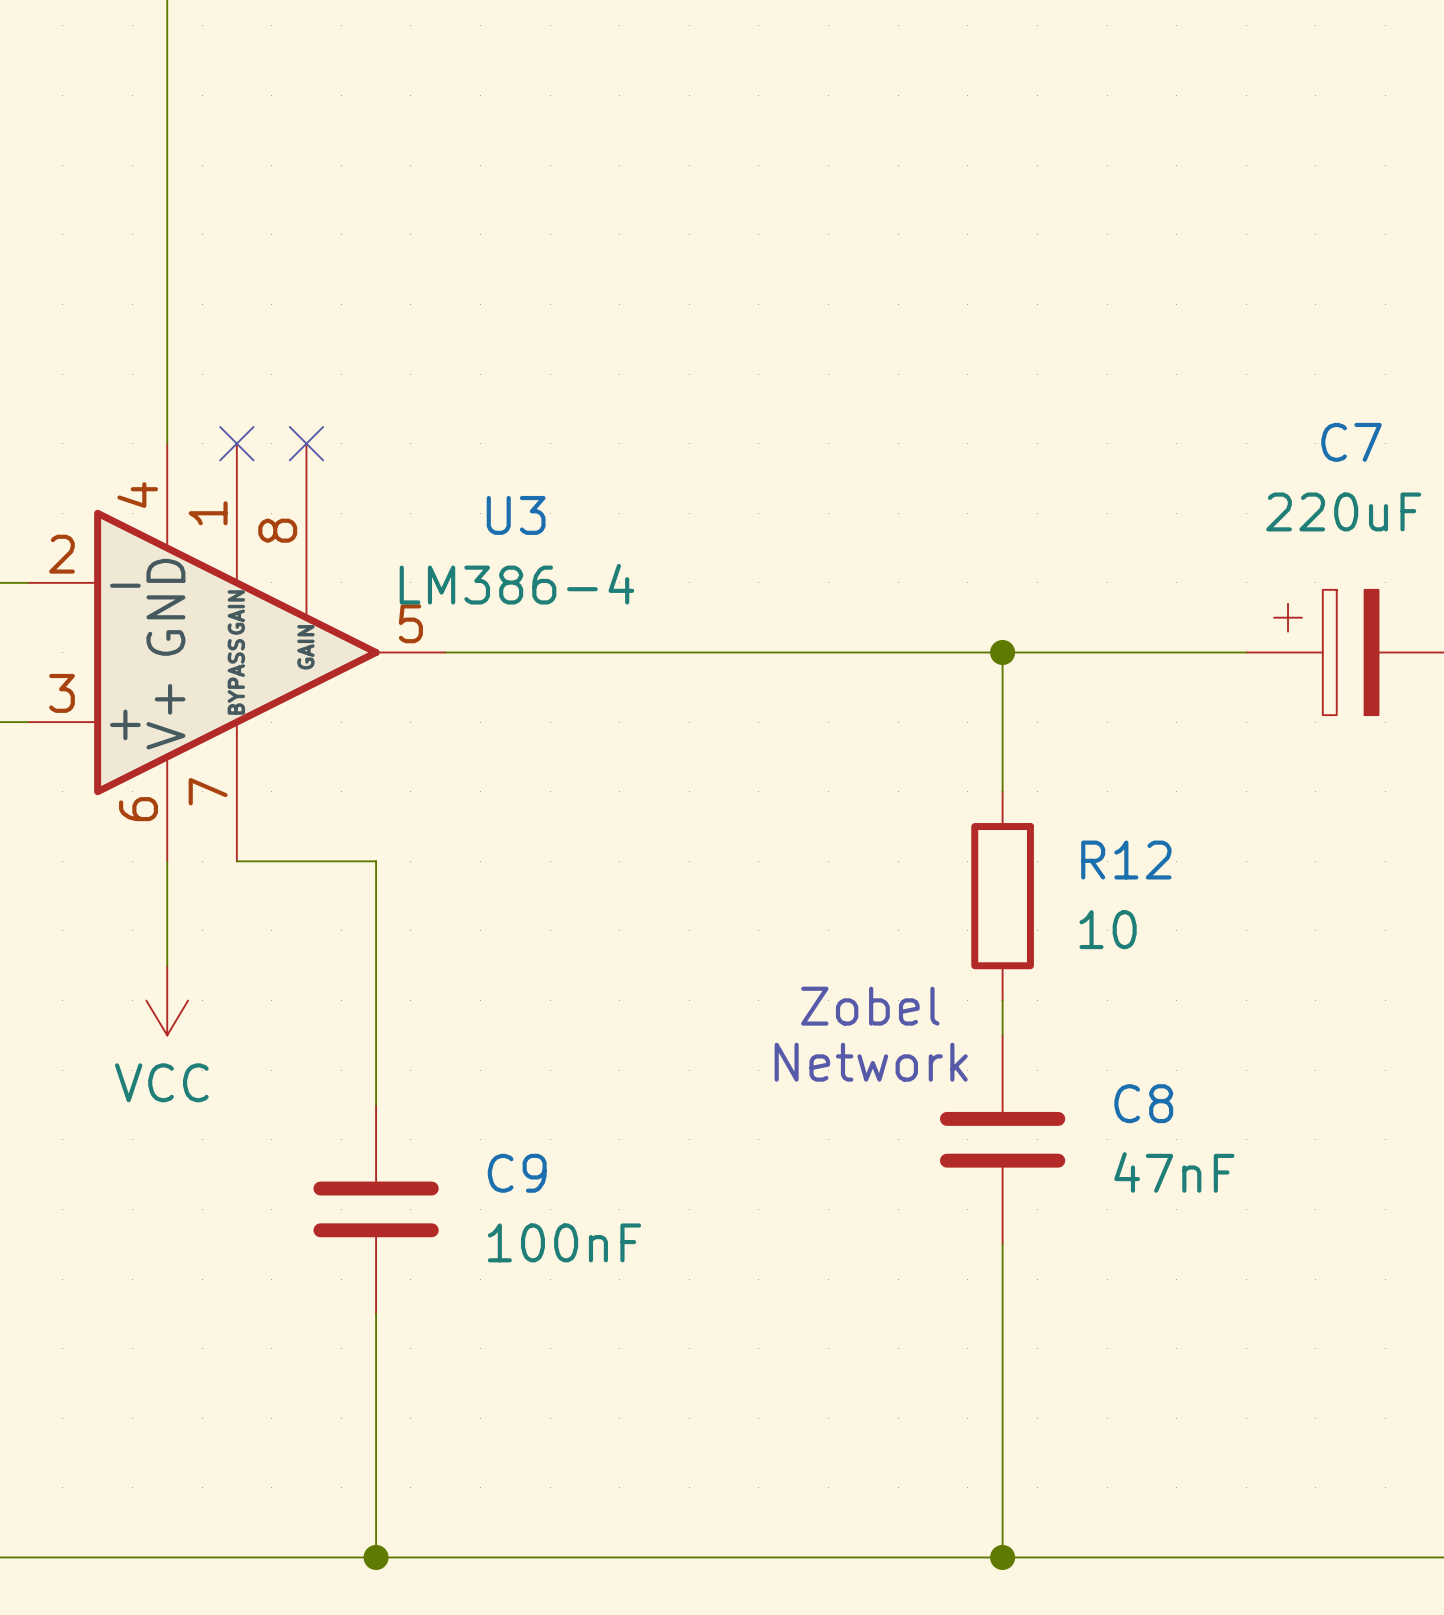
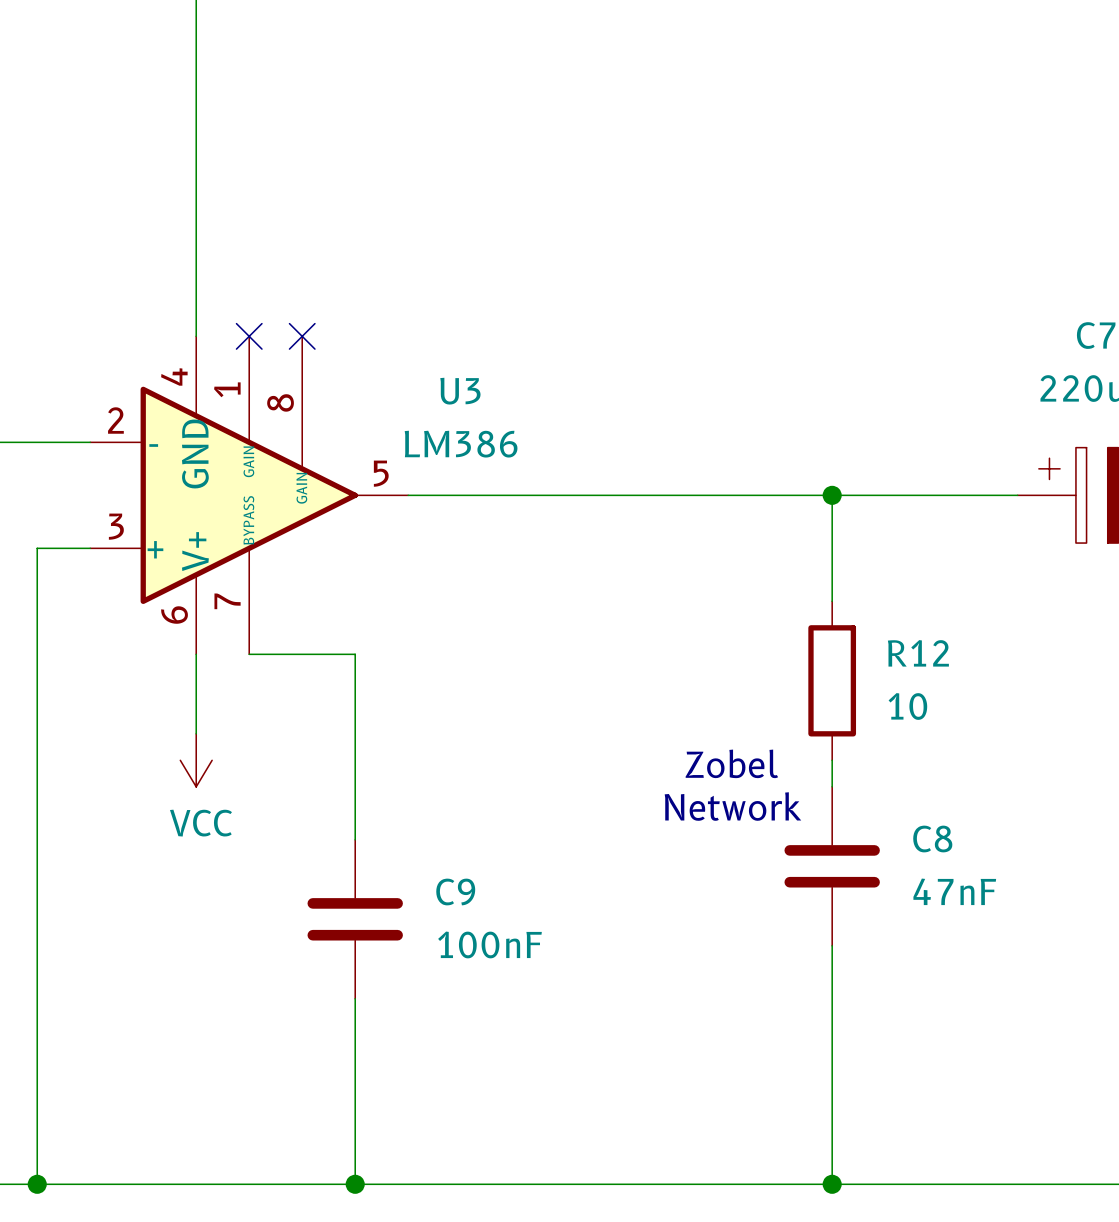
U3 value: LM386-4 (516, 584) -> LM386 (461, 444)

